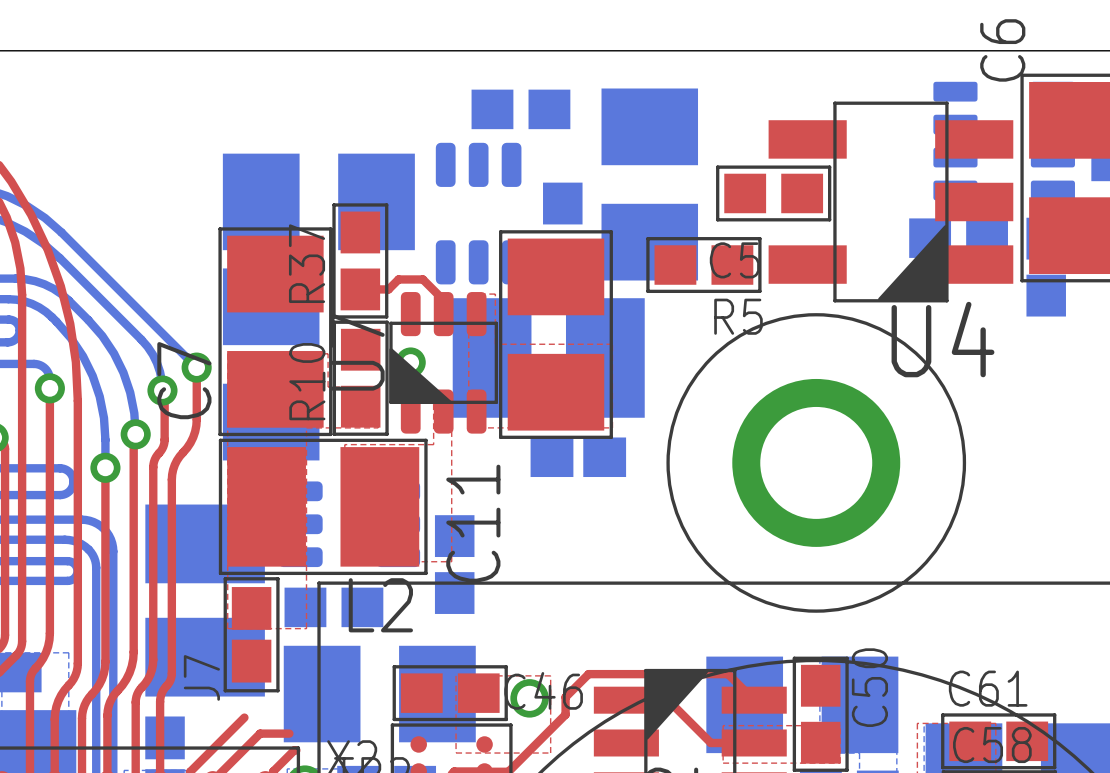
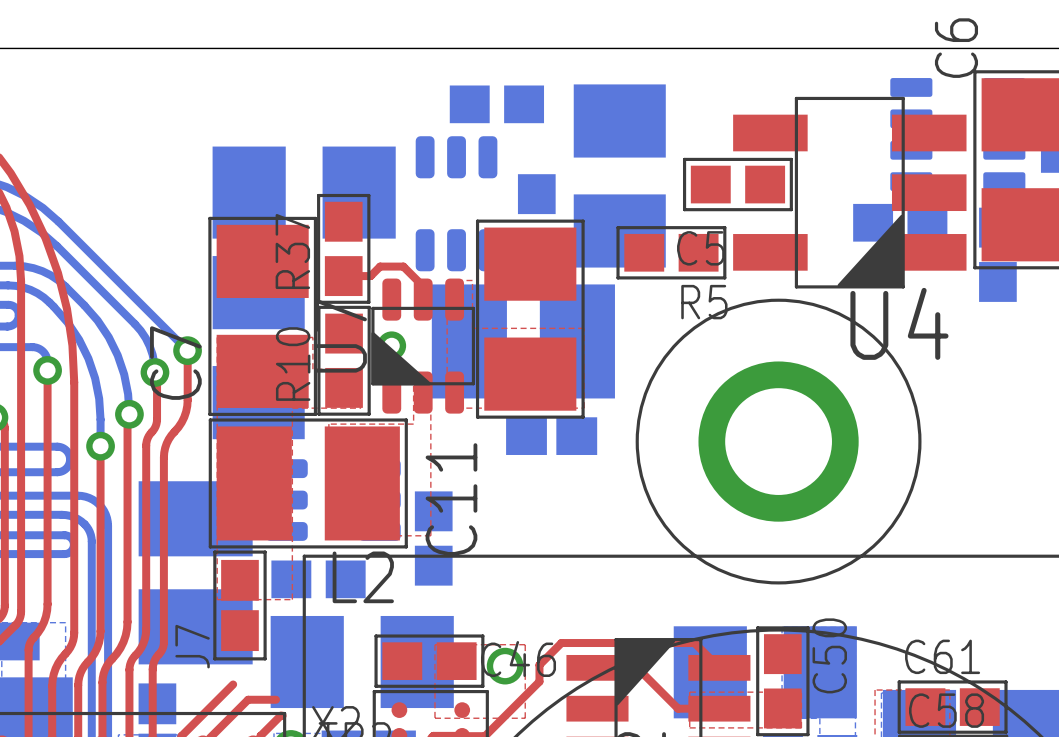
part position: (958, 238) -> (900, 222)

